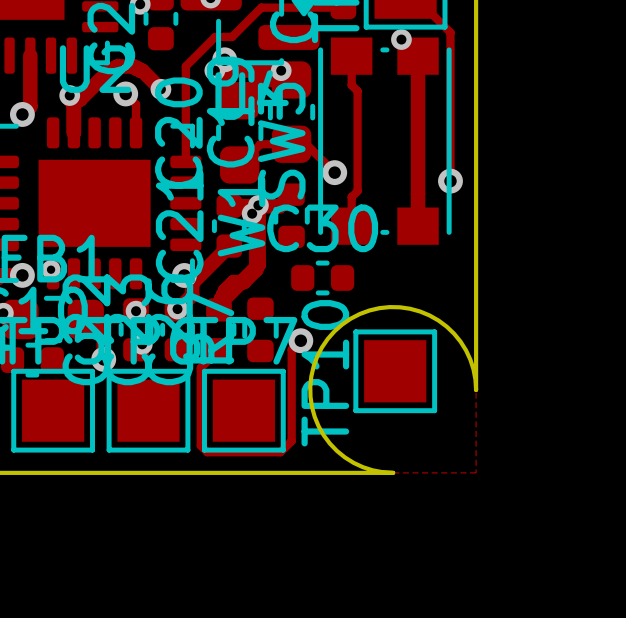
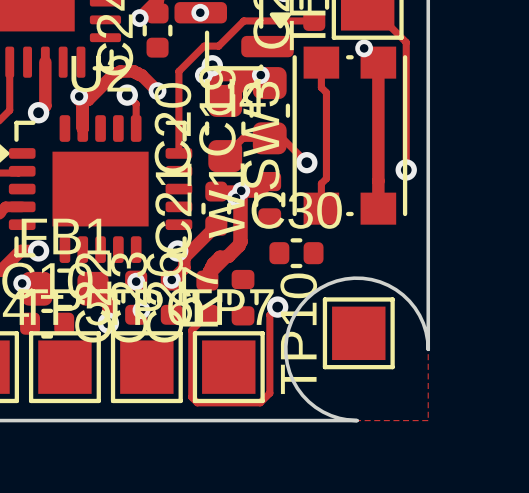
via: (51, 269) -> none

